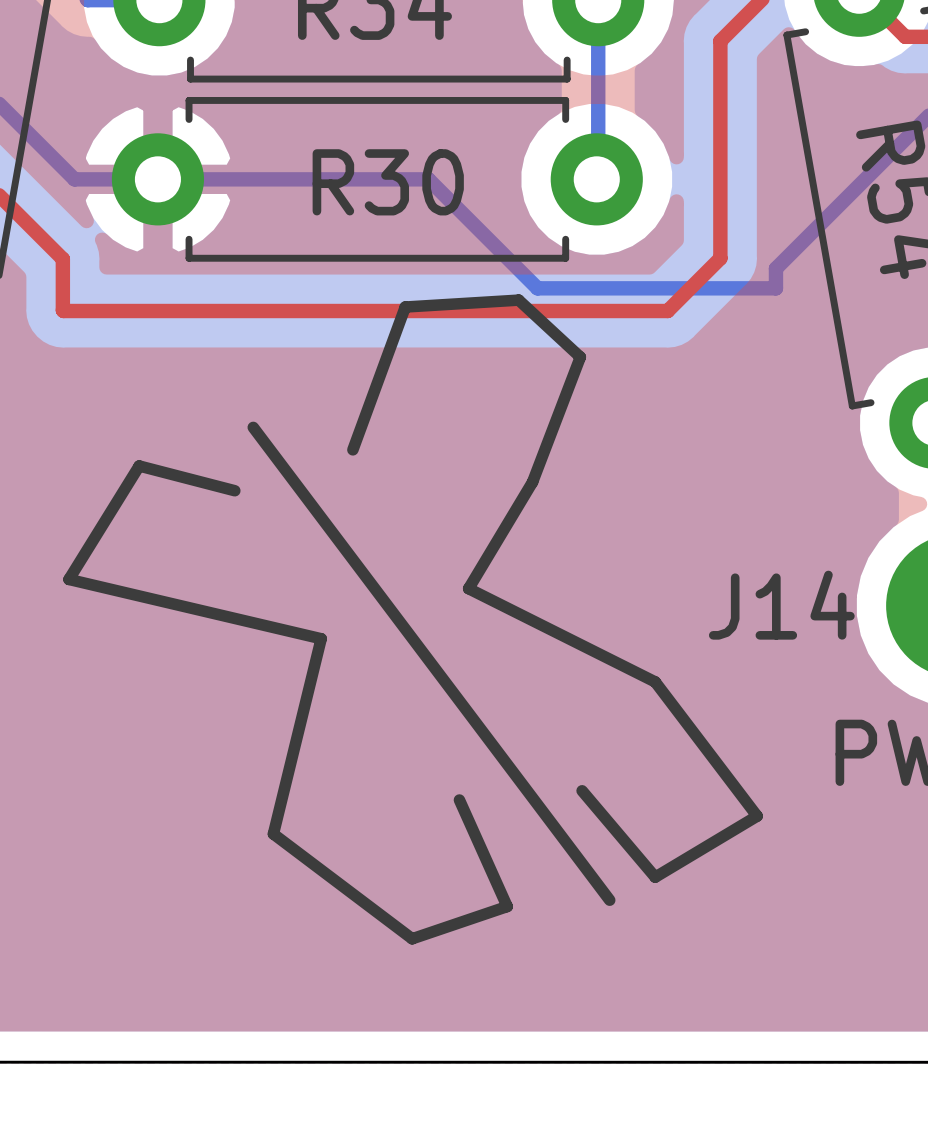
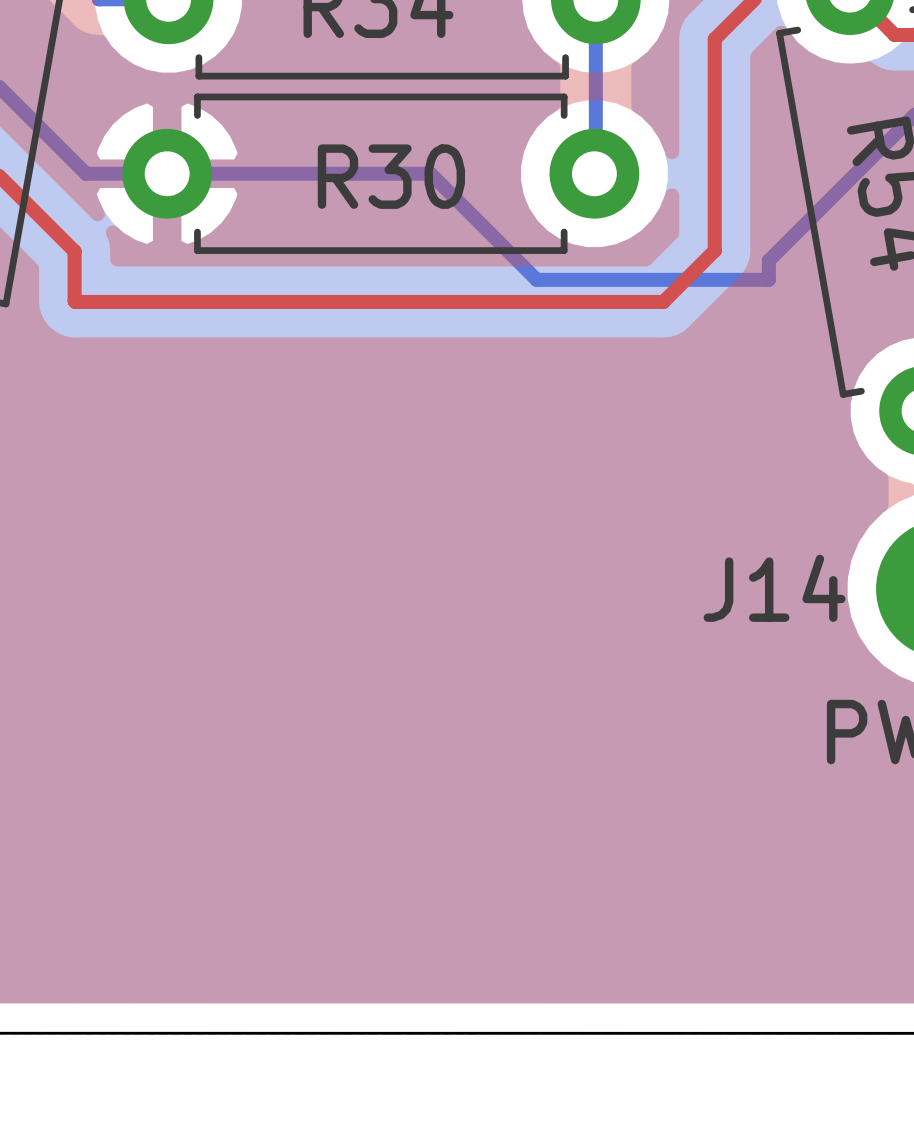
line: (253, 427) (609, 900) -> none
line: (352, 449) (405, 307) (518, 300) (580, 357) (532, 482) (468, 588) (655, 681) (757, 816) (655, 877) (582, 790) -> none
line: (234, 490) (139, 465) (68, 579) (321, 638) (273, 833) (412, 938) (507, 906) (459, 800) -> none

